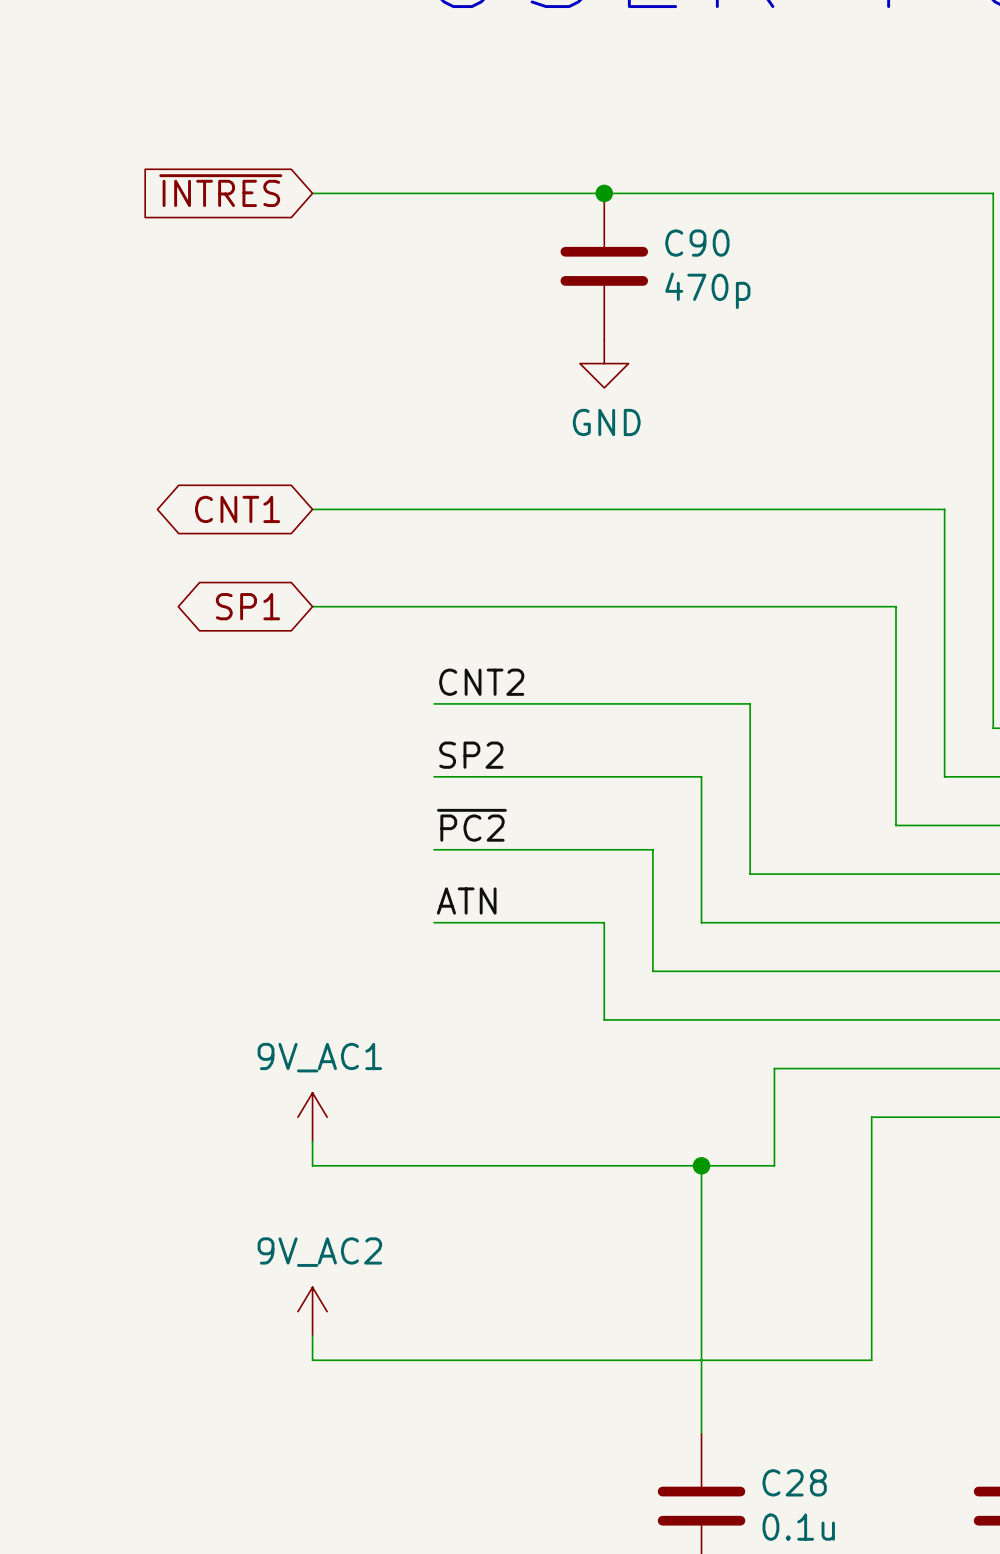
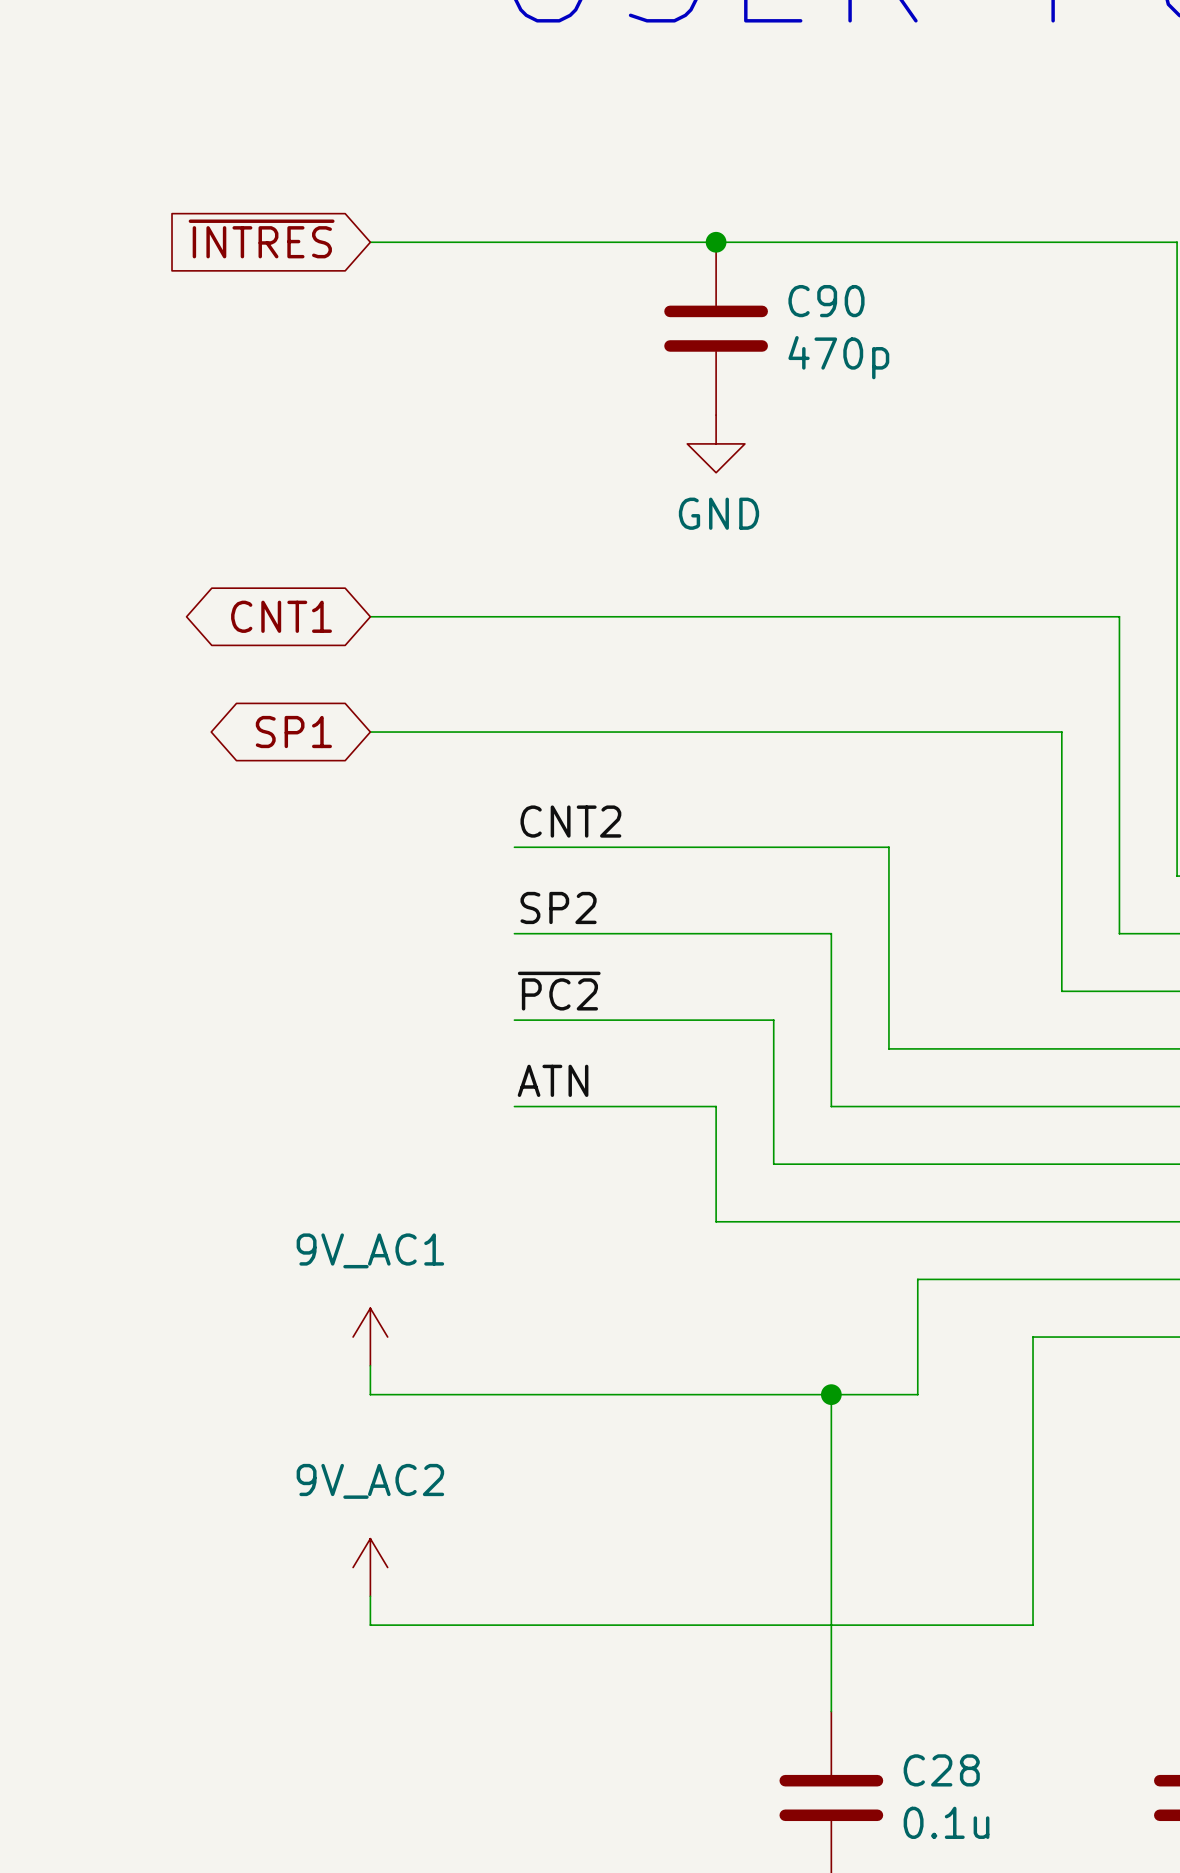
power symbol text position: 9V_AC1 (319, 1057) -> 9V_AC1 (370, 1250)
power symbol text position: 9V_AC2 (319, 1252) -> 9V_AC2 (370, 1481)

